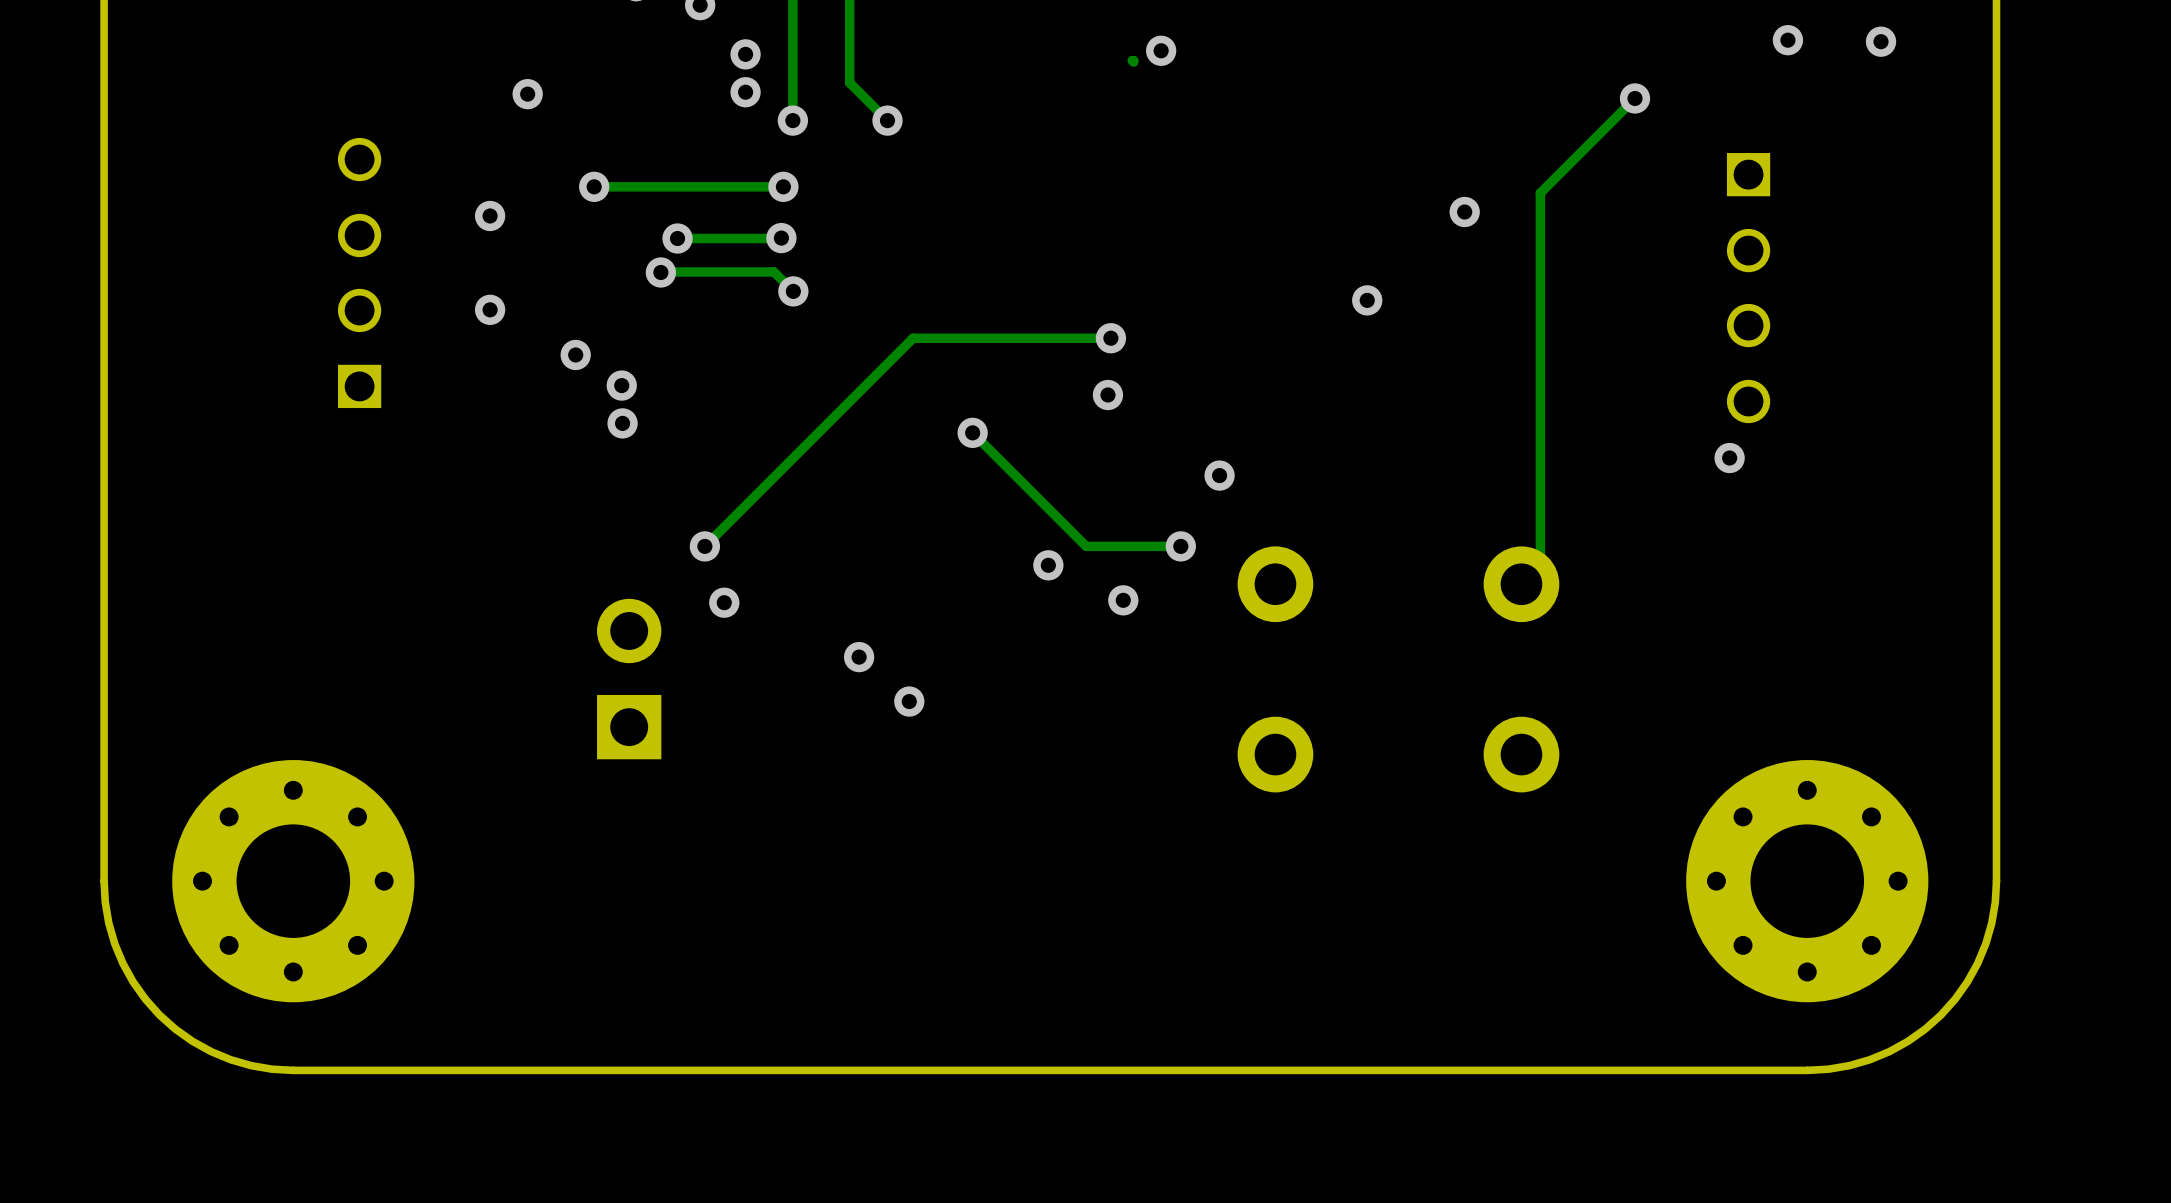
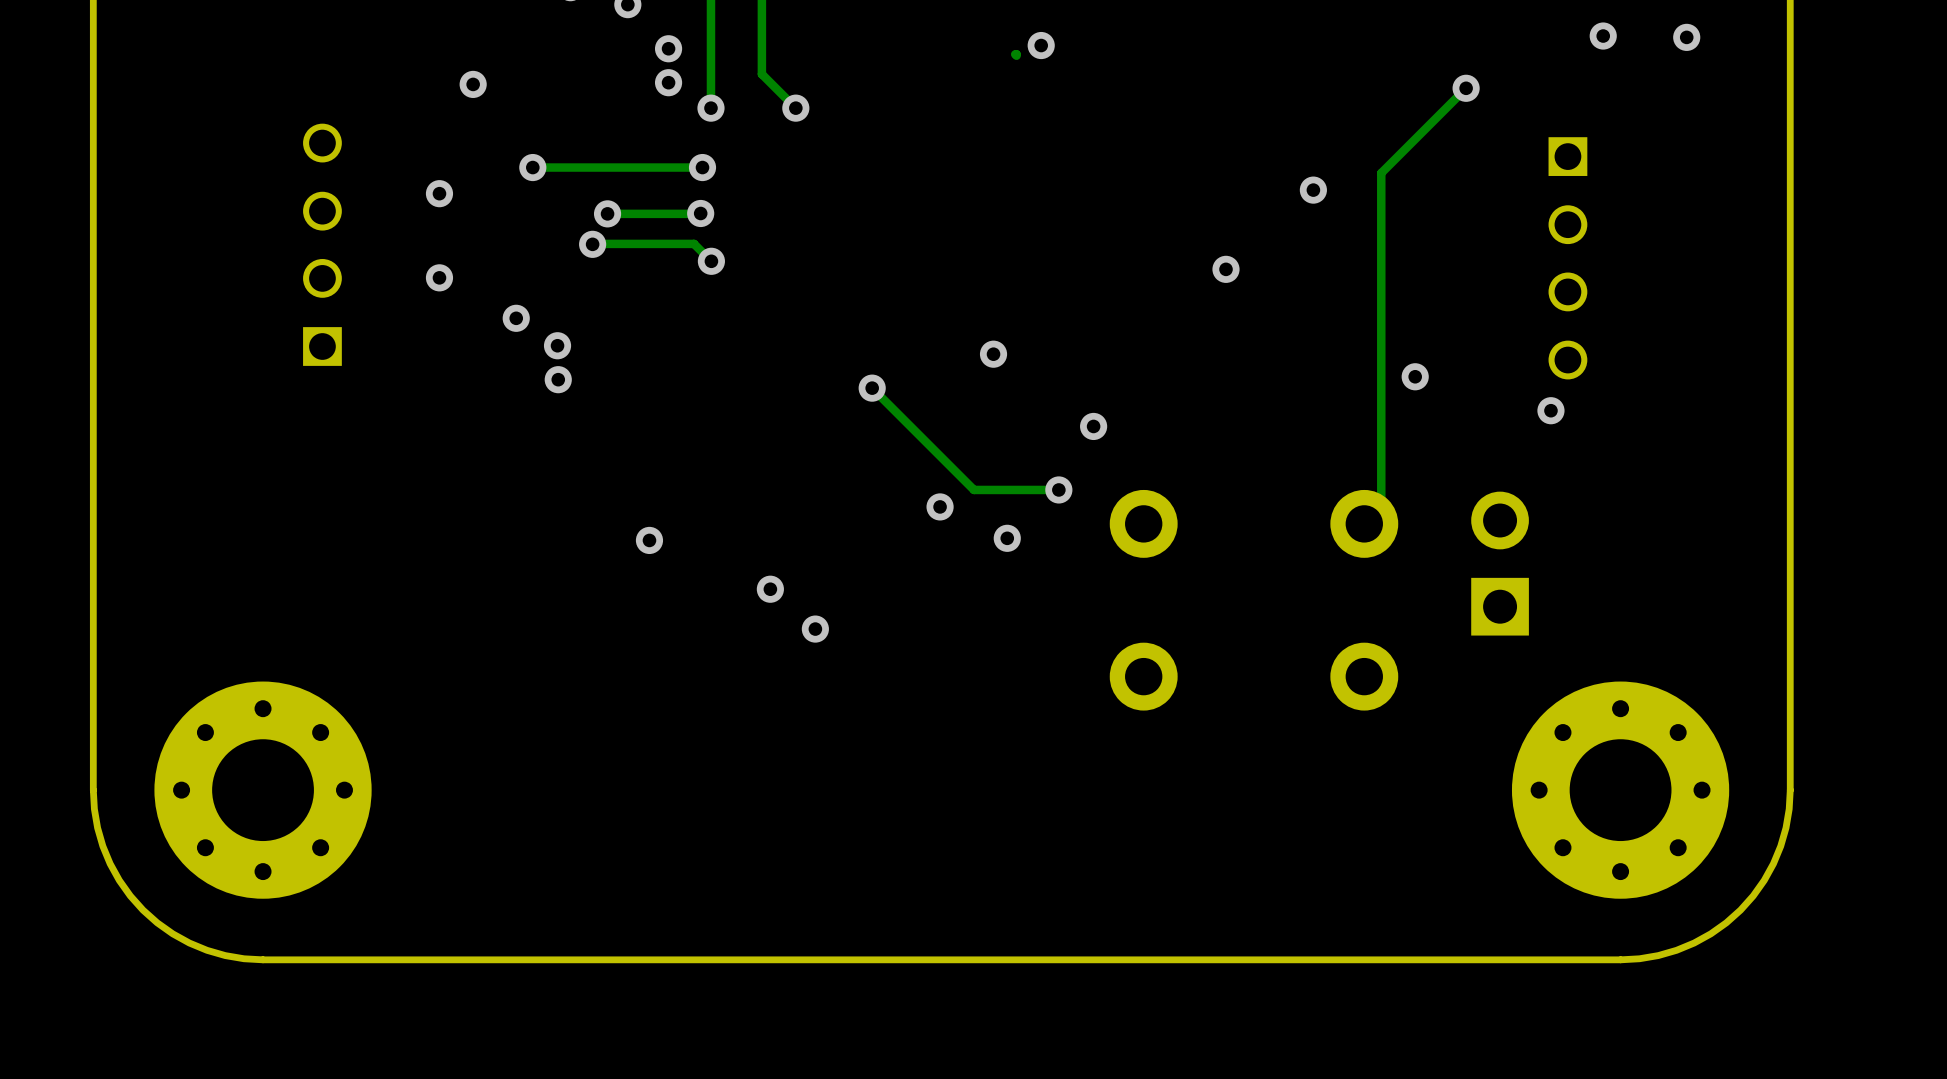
via: (1110, 338) -> none
track: (1115, 343) (1110, 338) (913, 338) (704, 546) -> none
via: none -> (1415, 376)
via: (704, 546) -> none
part: none -> (1500, 563)
part: (629, 679) -> none

